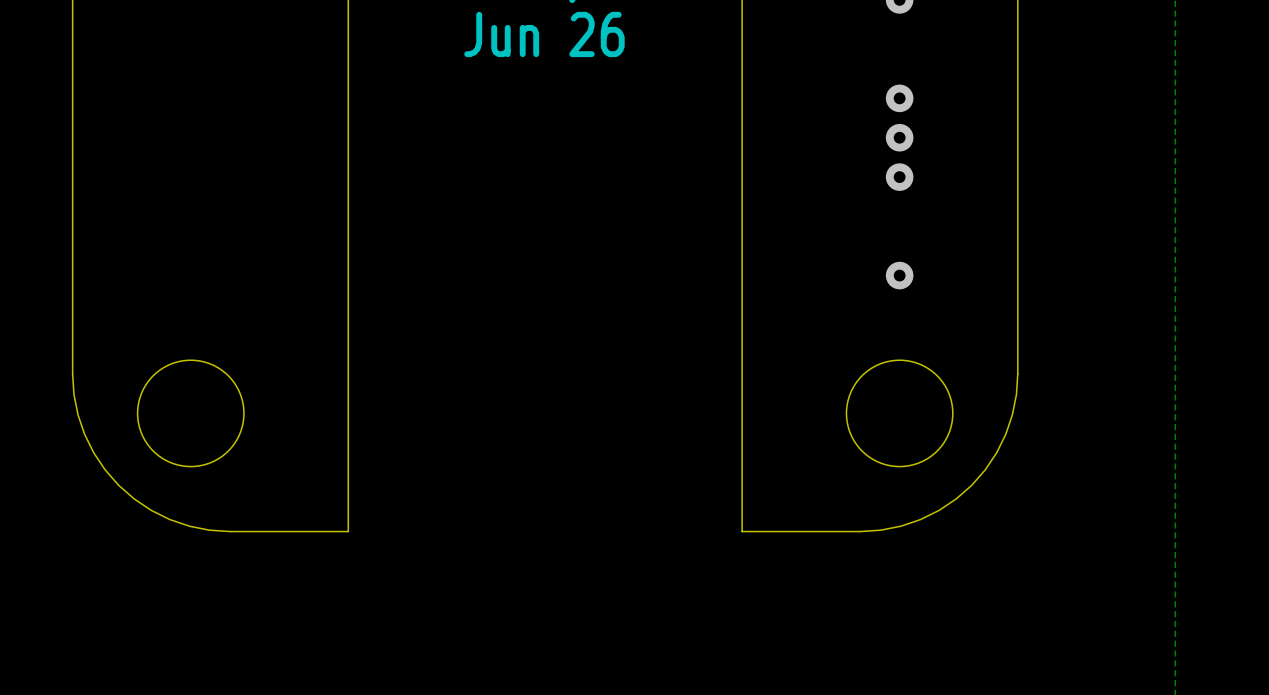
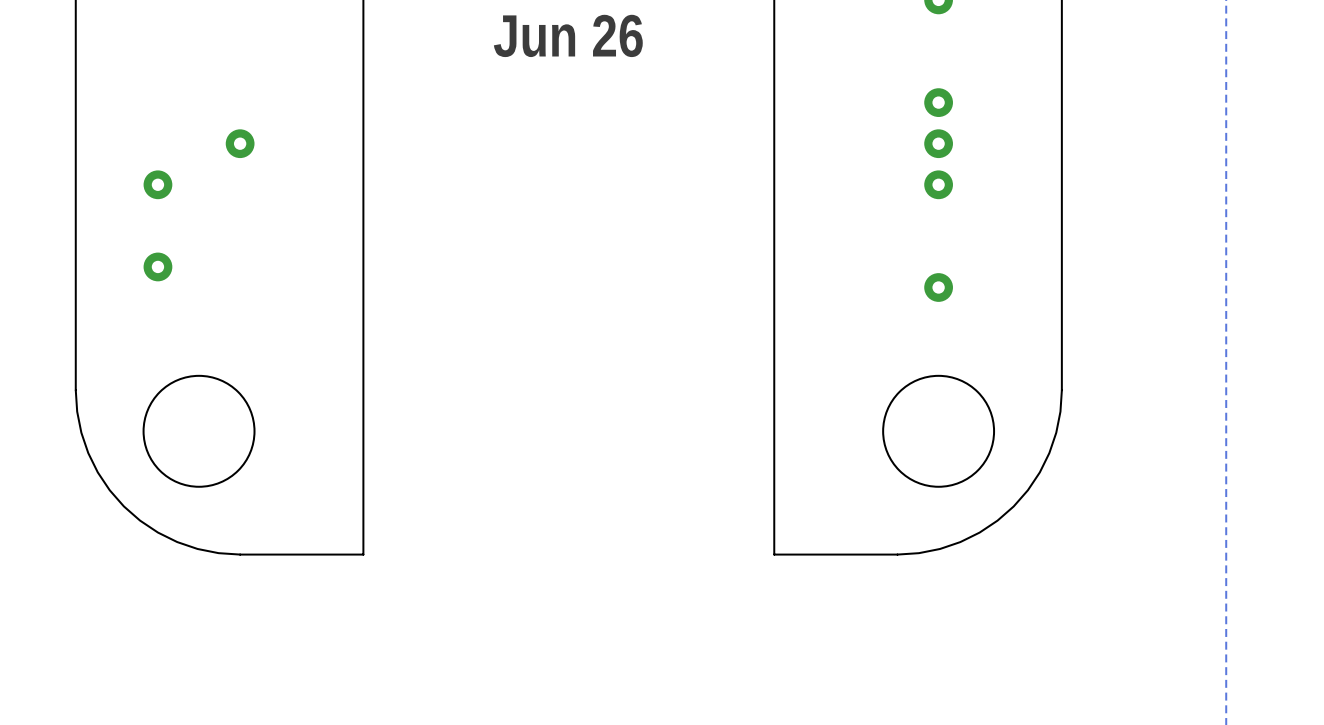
via: none -> (240, 143)
via: none -> (157, 184)
via: none -> (157, 266)

